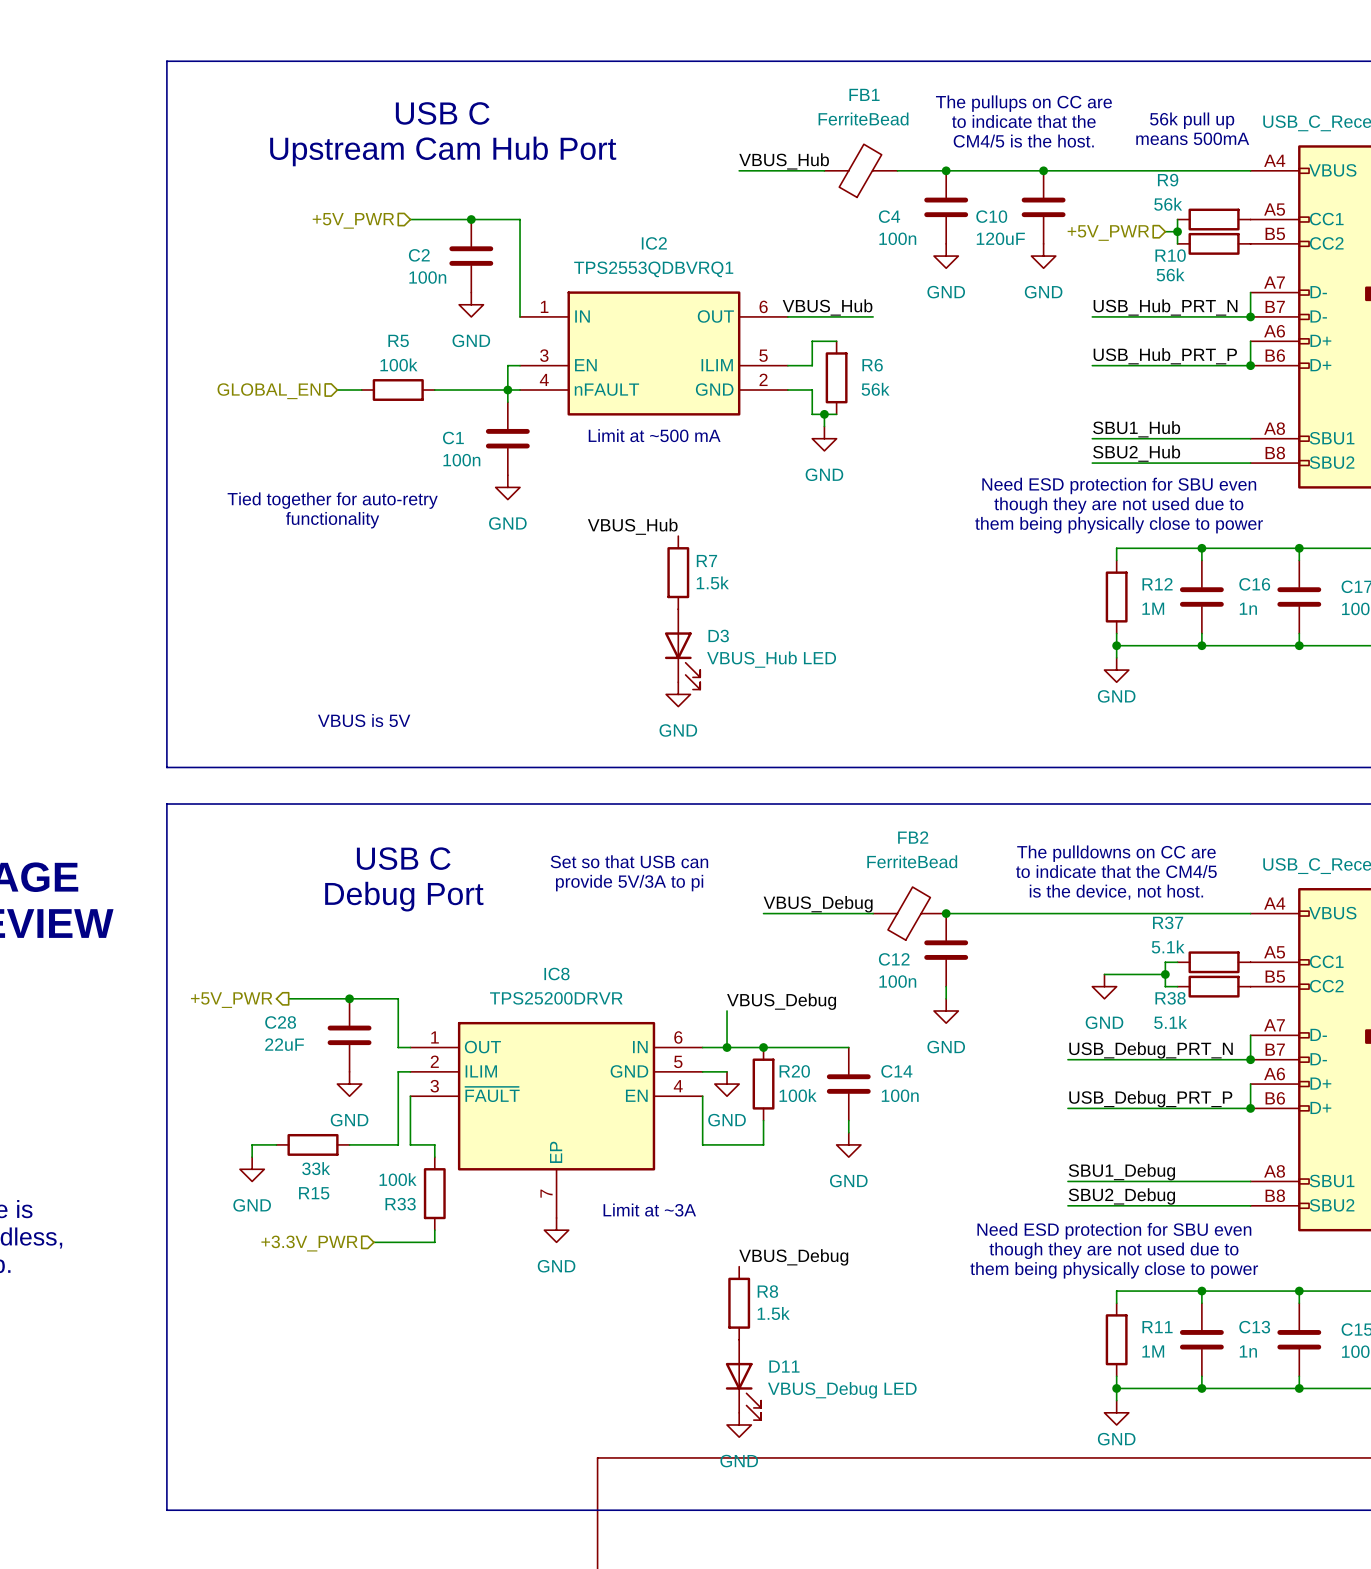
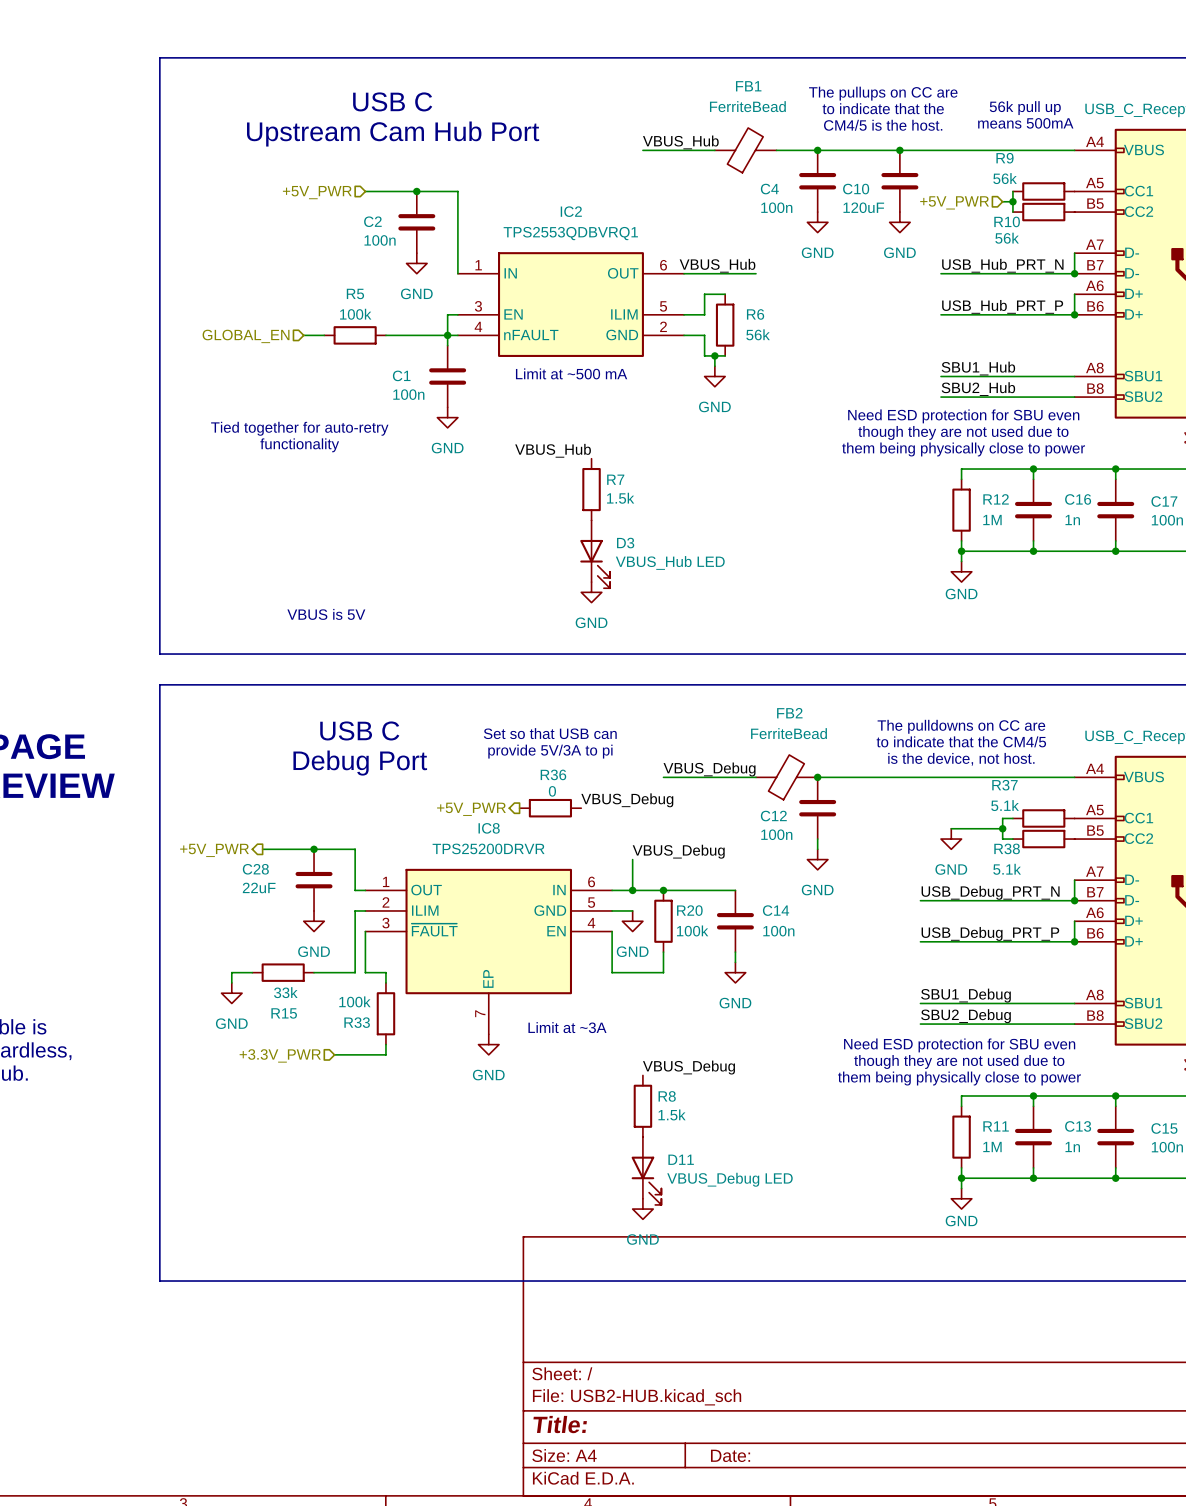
label: none -> VBUS_Debug (627, 800)
R36: none -> 0 (550, 808)
hierarchical label: none -> +5V_PWR (471, 809)

